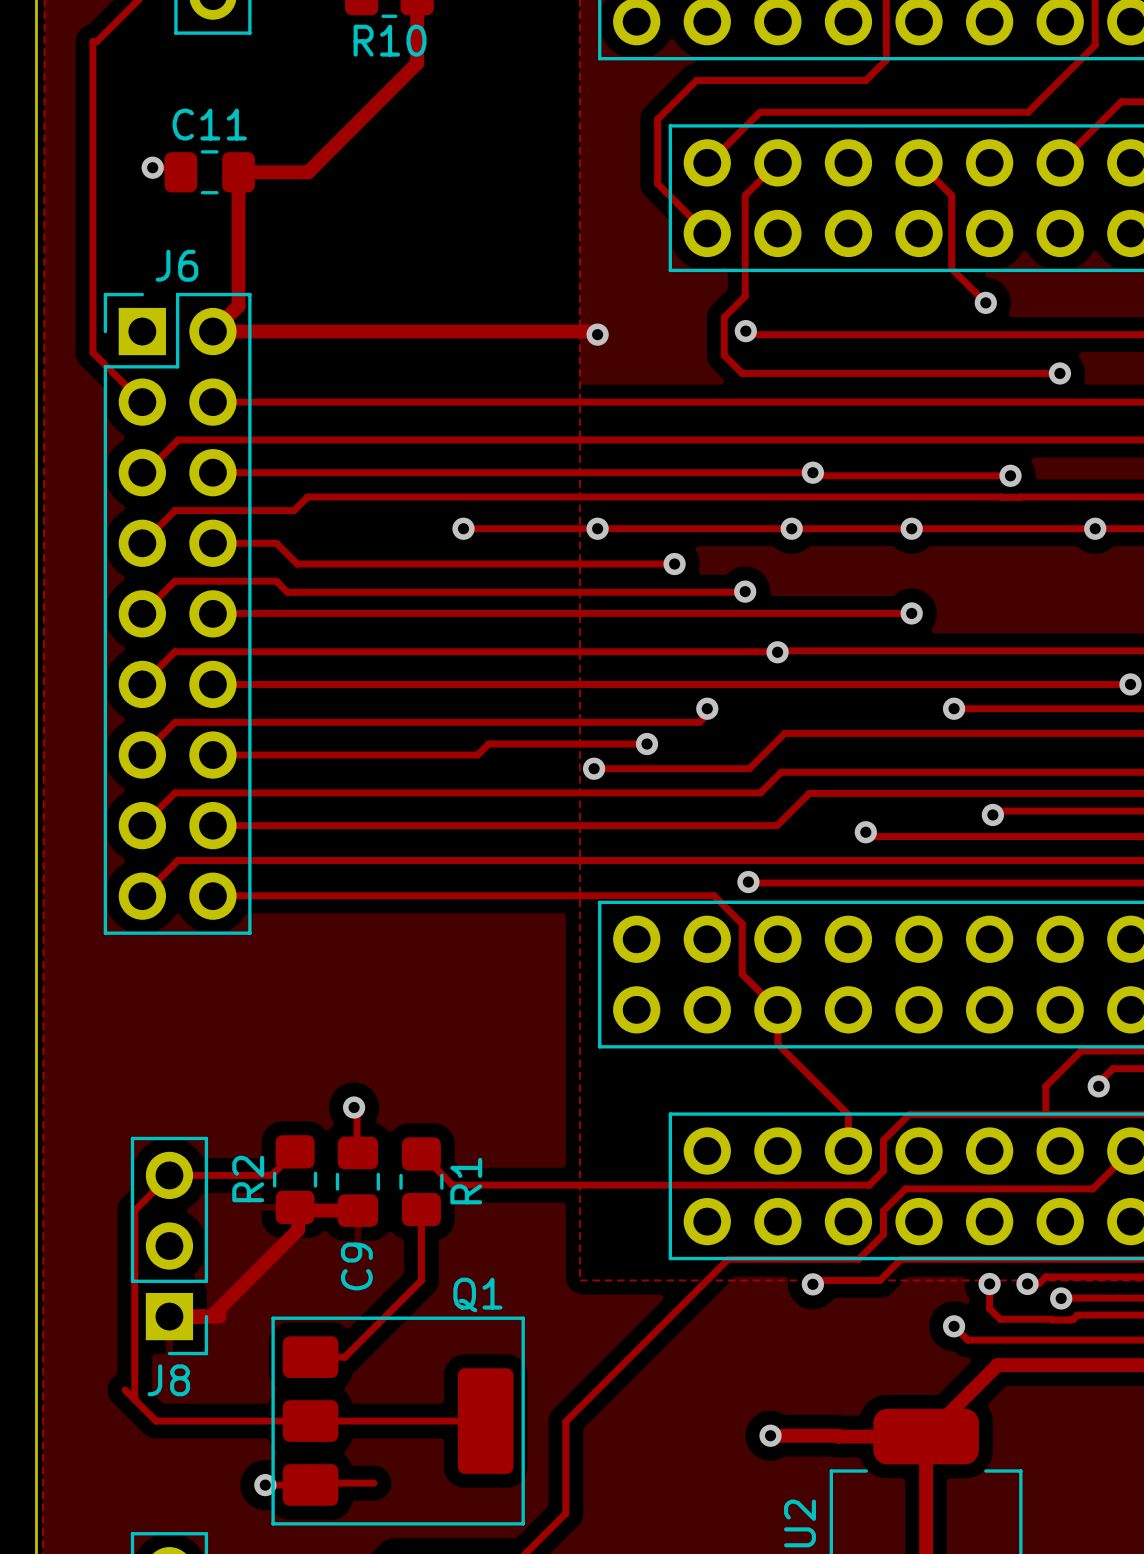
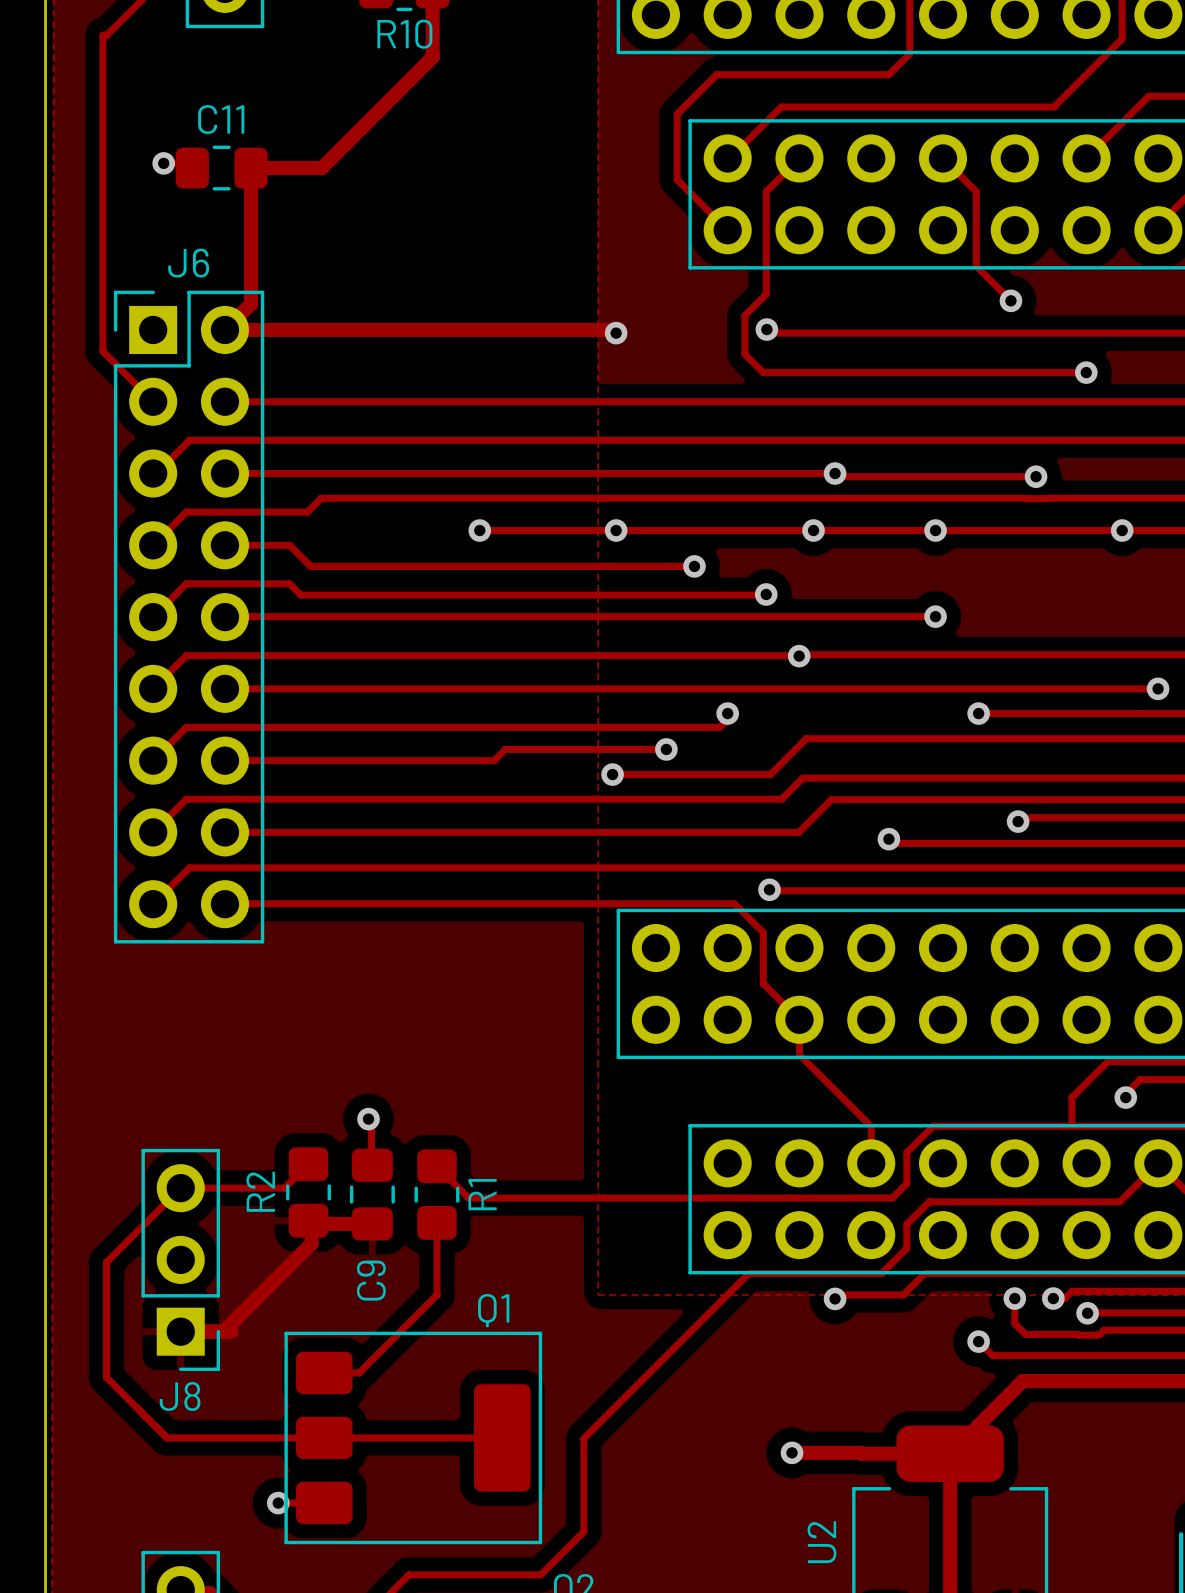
track: (169, 1175) (134, 1210) (134, 1399) -> (180, 1188) (106, 1262) (106, 1377) (166, 1437)
track: (312, 1483) (373, 1483) -> none

